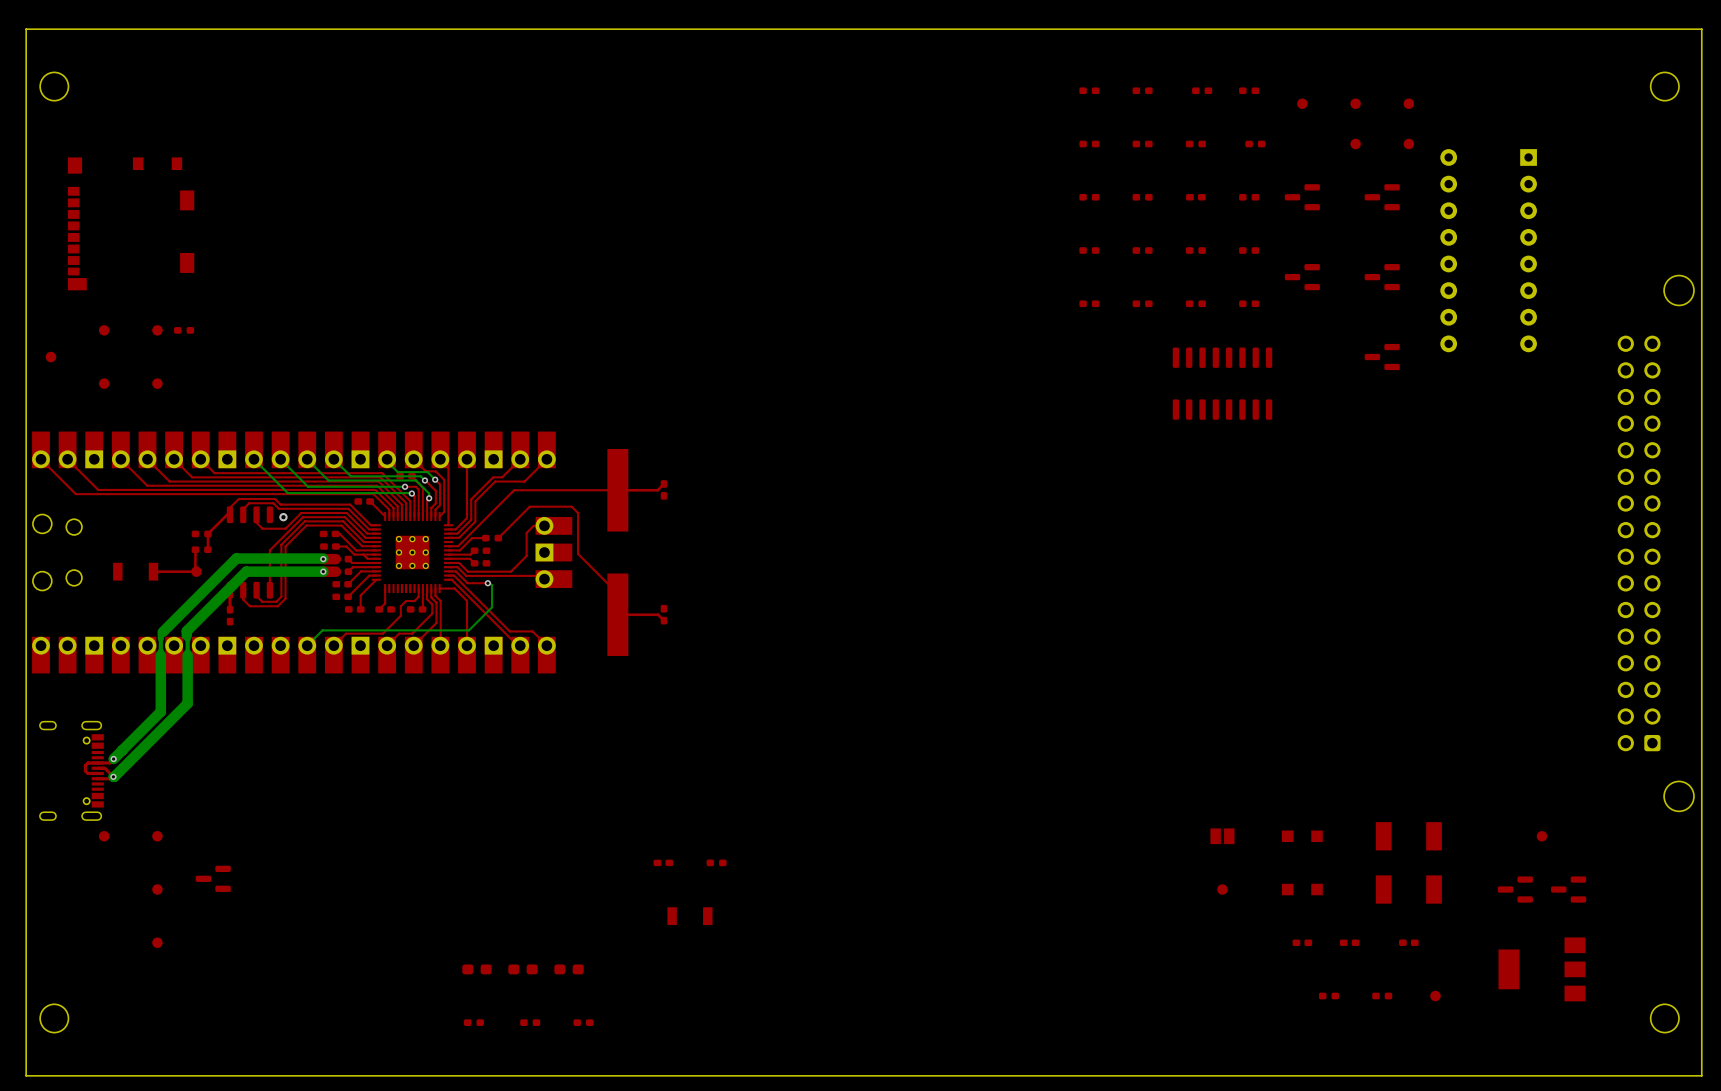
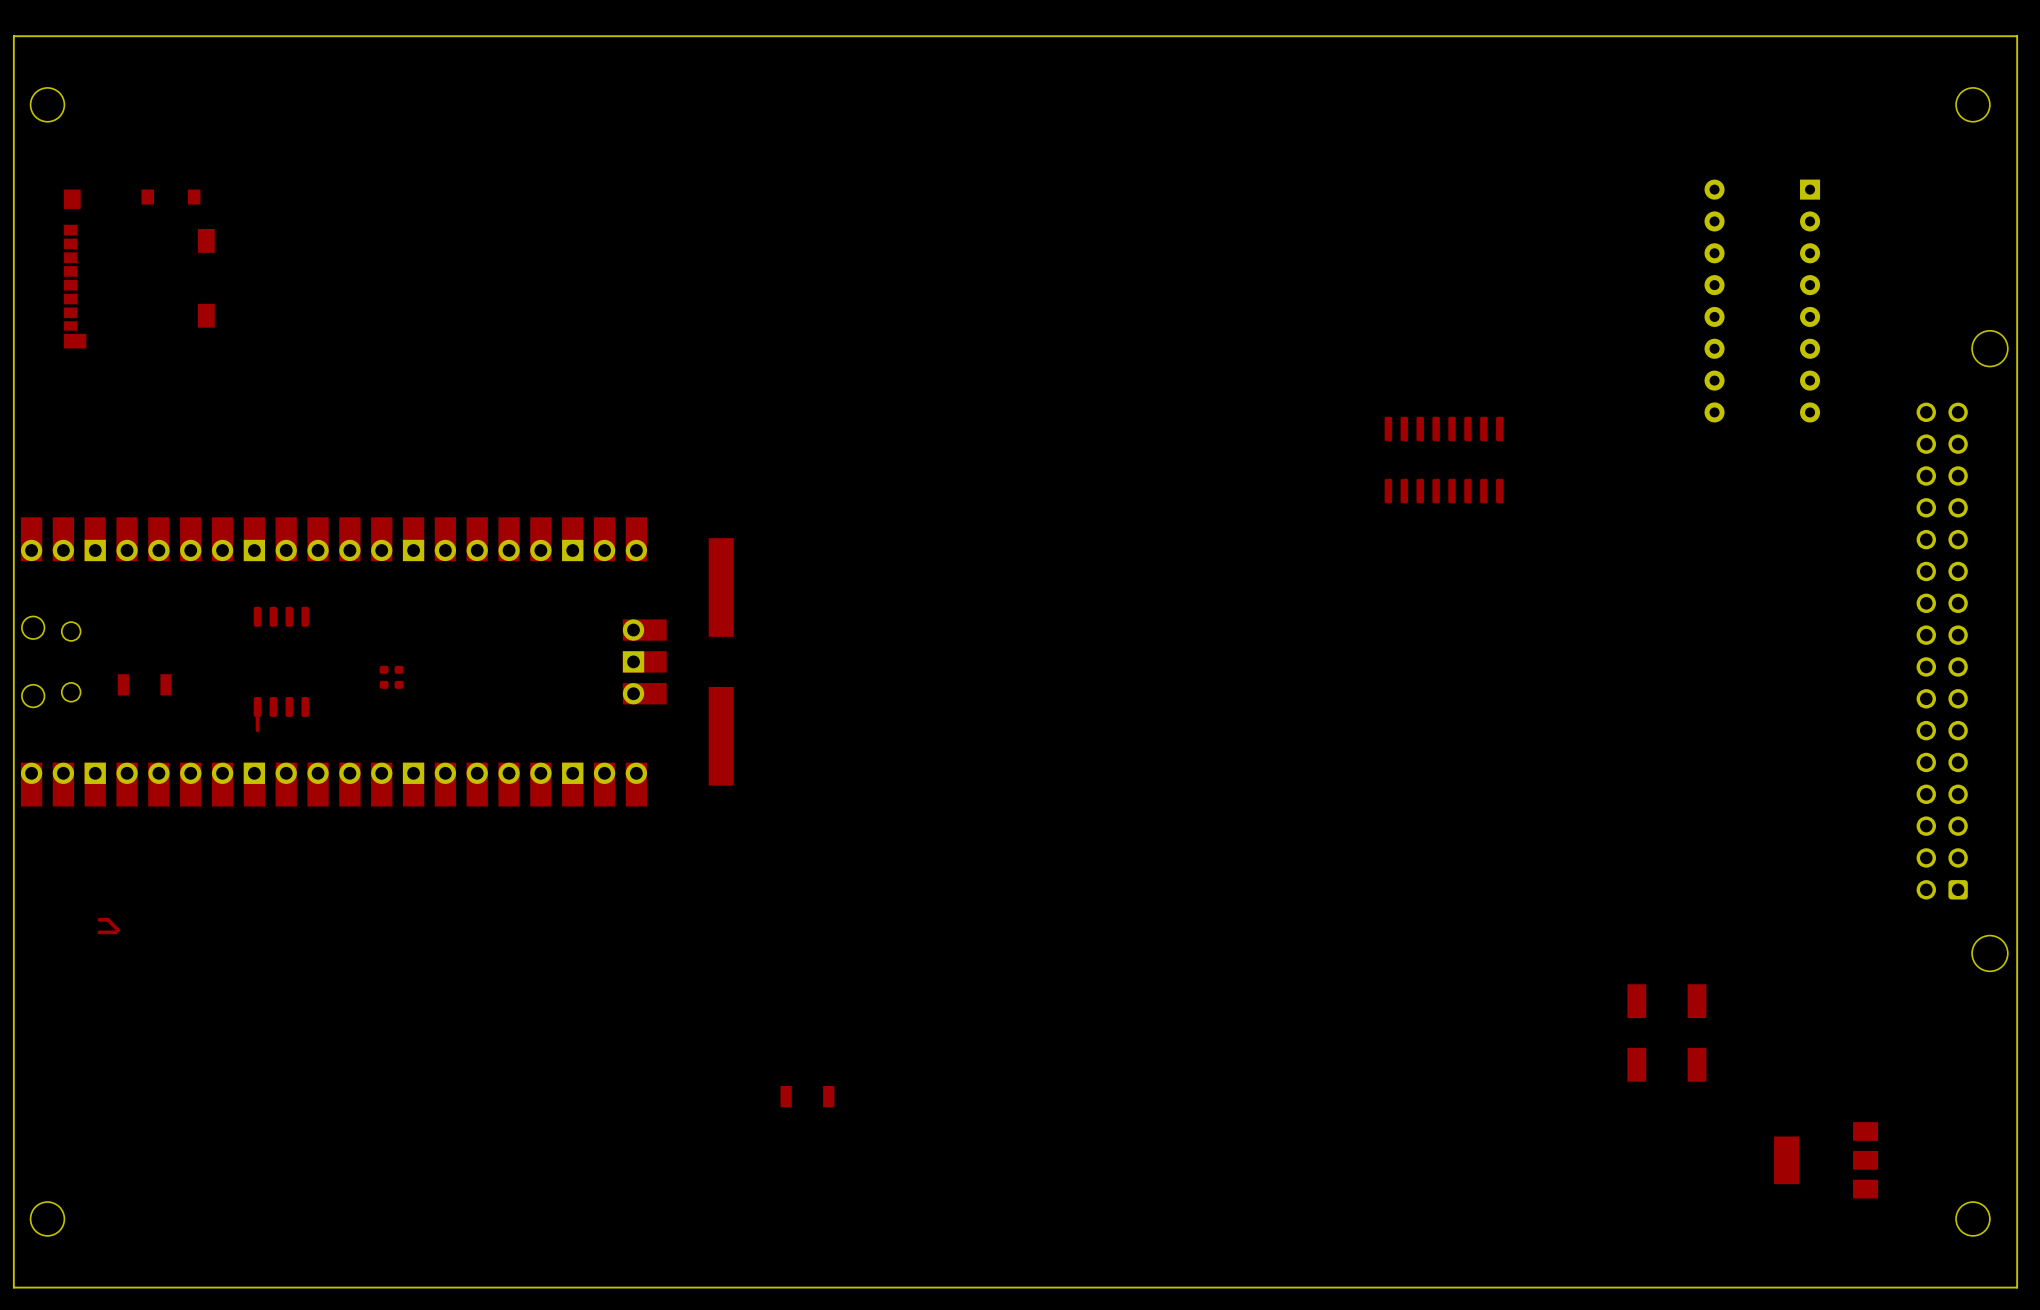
part: (1089, 90) -> none
part: (1142, 90) -> none
part: (1202, 90) -> none
part: (1249, 90) -> none
part: (1302, 103) -> none
part: (1355, 103) -> none
part: (1408, 103) -> none
part: (1089, 144) -> none
part: (1142, 144) -> none
part: (1195, 144) -> none
part: (1255, 144) -> none
part: (1355, 144) -> none
part: (1408, 144) -> none
part: (1089, 197) -> none
part: (1142, 197) -> none
part: (1195, 197) -> none
part: (1249, 197) -> none
part: (1302, 197) -> none
part: (1382, 197) -> none
part: (1089, 250) -> none
part: (1142, 250) -> none
part: (1195, 250) -> none
part: (1249, 250) -> none
part: (1302, 277) -> none
part: (1382, 277) -> none
part: (1089, 303) -> none
part: (1142, 303) -> none
part: (1195, 303) -> none
part: (1249, 303) -> none
part: (104, 330) -> none
part: (157, 330) -> none
part: (184, 330) -> none
part: (50, 357) -> none
part: (1382, 357) -> none
part: (104, 383) -> none
part: (157, 383) -> none
top track: (40, 459) (75, 494) (373, 494) (389, 509) (389, 516) -> none
top track: (67, 459) (98, 489) (375, 489) (393, 508) (393, 516) -> none
top track: (120, 459) (147, 485) (377, 485) (397, 506) (397, 516) -> none
top track: (147, 459) (169, 481) (378, 481) (401, 504) (401, 516) -> none
top track: (174, 459) (192, 477) (380, 477) (406, 502) (406, 516) -> none
top track: (200, 459) (214, 473) (382, 473) (410, 501) (410, 516) -> none
bottom track: (253, 459) (287, 493) (411, 493) -> none
bottom track: (280, 459) (308, 486) (404, 486) -> none
bottom track: (307, 459) (328, 480) (416, 480) (429, 493) (429, 498) -> none
bottom track: (333, 459) (350, 476) (420, 476) (424, 480) -> none
bottom track: (387, 459) (397, 472) (427, 472) (435, 479) -> none
top track: (413, 459) (425, 471) (435, 471) (444, 479) (444, 511) (439, 516) -> none
top track: (440, 459) (448, 467) (448, 525) -> none
top track: (467, 459) (467, 518) (455, 529) (448, 529) -> none
top track: (520, 459) (502, 477) (493, 477) (471, 499) (471, 519) (457, 533) (448, 533) -> none
top track: (546, 459) (524, 481) (495, 481) (475, 501) (475, 521) (459, 537) (448, 537) -> none
part: (406, 476) -> none
top track: (412, 476) (422, 487) (422, 516) -> none
top track: (435, 479) (440, 484) (440, 505) (435, 509) (435, 516) -> none
via: (435, 479) -> none
top track: (424, 480) (435, 490) (435, 503) (431, 508) (431, 516) -> none
via: (424, 480) -> none
top track: (663, 483) (657, 490) (514, 490) (458, 546) (448, 546) -> none
top track: (405, 486) (415, 486) (418, 489) (418, 516) -> none
via: (405, 486) -> none
part: (663, 489) -> none
via: (411, 493) -> none
top track: (412, 494) (414, 496) (414, 516) -> none
top track: (429, 498) (427, 500) (427, 516) -> none
via: (429, 498) -> none
part: (364, 501) -> none
top track: (370, 501) (385, 516) -> none
top track: (243, 514) (243, 509) (249, 503) (273, 503) (278, 508) (348, 508) (369, 529) (376, 529) -> none
top track: (256, 514) (256, 522) (262, 528) (285, 528) (301, 512) (346, 512) (367, 533) (376, 533) -> none
via: (283, 517) -> none
top track: (376, 525) (370, 525) (350, 504) (280, 504) (275, 499) (238, 499) (229, 507) (229, 514) (227, 514) (207, 533) (207, 549) -> none
top track: (544, 525) (533, 525) (526, 532) (526, 555) (510, 571) (467, 571) (459, 562) (448, 562) -> none
part: (201, 533) -> none
part: (329, 533) -> none
top track: (335, 533) (339, 533) (356, 550) (376, 550) -> none
top track: (376, 537) (365, 537) (344, 517) (303, 517) (269, 550) (269, 590) -> none
top track: (485, 538) (472, 538) (459, 550) (448, 550) -> none
part: (492, 538) -> none
top track: (498, 538) (529, 506) (571, 506) (578, 512) (578, 553) (617, 593) (617, 614) (658, 614) (663, 620) -> none
top track: (376, 542) (363, 542) (343, 521) (304, 521) (281, 544) (281, 596) (276, 601) (262, 601) (256, 596) (256, 590) -> none
part: (329, 546) -> none
top track: (335, 546) (346, 546) (354, 554) (376, 554) -> none
top track: (376, 546) (362, 546) (341, 525) (306, 525) (285, 546) (285, 598) (277, 606) (249, 606) (243, 599) (243, 590) -> none
top track: (195, 549) (196, 571) (153, 571) -> none
part: (201, 549) -> none
top track: (474, 550) (470, 554) (448, 554) -> none
part: (480, 550) -> none
part: (412, 552) -> none
top track: (363, 554) (367, 558) (376, 558) -> none
bottom track: (323, 558) (236, 558) (162, 632) -> none
top track: (448, 558) (470, 558) (474, 563) -> none
via: (323, 559) -> none
top track: (335, 559) (323, 559) -> none
top track: (348, 559) (352, 562) (376, 562) -> none
part: (480, 563) -> none
top track: (376, 567) (352, 567) (348, 571) -> none
top track: (448, 567) (457, 567) (466, 575) (541, 575) (544, 579) -> none
part: (196, 571) -> none
bottom track: (323, 571) (246, 571) (186, 631) (186, 635) -> none
via: (323, 571) -> none
top track: (335, 571) (323, 571) -> none
top track: (376, 571) (360, 571) (348, 584) -> none
top track: (448, 571) (455, 571) (467, 583) (487, 583) -> none
top track: (376, 575) (369, 575) (348, 596) -> none
top track: (448, 575) (454, 575) (509, 631) (532, 631) (546, 645) -> none
top track: (376, 579) (360, 595) (360, 609) -> none
top track: (448, 579) (451, 579) (517, 645) (520, 645) -> none
bottom track: (487, 583) (492, 585) (492, 607) (468, 630) (322, 630) (307, 645) -> none
via: (487, 583) -> none
part: (342, 584) -> none
top track: (385, 588) (385, 603) (379, 609) -> none
top track: (418, 588) (418, 596) (414, 601) (406, 601) (400, 606) (400, 615) (382, 633) (345, 633) (333, 645) -> none
top track: (422, 588) (422, 608) -> none
top track: (427, 588) (427, 599) (432, 604) (432, 613) (412, 633) (399, 633) (387, 645) -> none
top track: (431, 588) (431, 597) (436, 602) (436, 622) (413, 645) -> none
top track: (435, 588) (435, 595) (440, 601) (440, 645) -> none
top track: (439, 588) (454, 588) (467, 600) (467, 645) -> none
part: (342, 596) -> none
part: (354, 609) -> none
part: (385, 609) -> none
part: (416, 609) -> none
part: (663, 614) -> none
part: (229, 615) -> none
bottom track: (160, 634) (160, 711) (113, 759) -> none
bottom track: (187, 636) (187, 703) (113, 776) (113, 778) -> none
top track: (113, 759) (109, 762) (87, 762) (85, 765) (85, 770) (87, 773) (97, 773) -> none
via: (113, 759) -> none
part: (71, 770) -> none
via: (113, 776) -> none
part: (104, 836) -> none
part: (157, 836) -> none
part: (1222, 836) -> none
part: (1302, 836) -> none
part: (1541, 836) -> none
part: (663, 862) -> none
part: (716, 862) -> none
part: (213, 878) -> none
part: (157, 889) -> none
part: (1222, 889) -> none
part: (1302, 889) -> none
part: (1515, 889) -> none
part: (1568, 889) -> none
part: (157, 942) -> none
part: (1302, 942) -> none
part: (1349, 942) -> none
part: (1408, 942) -> none
part: (476, 969) -> none
part: (522, 969) -> none
part: (568, 969) -> none
part: (1328, 996) -> none
part: (1382, 996) -> none
part: (1435, 996) -> none
part: (473, 1022) -> none
part: (530, 1022) -> none
part: (583, 1022) -> none

